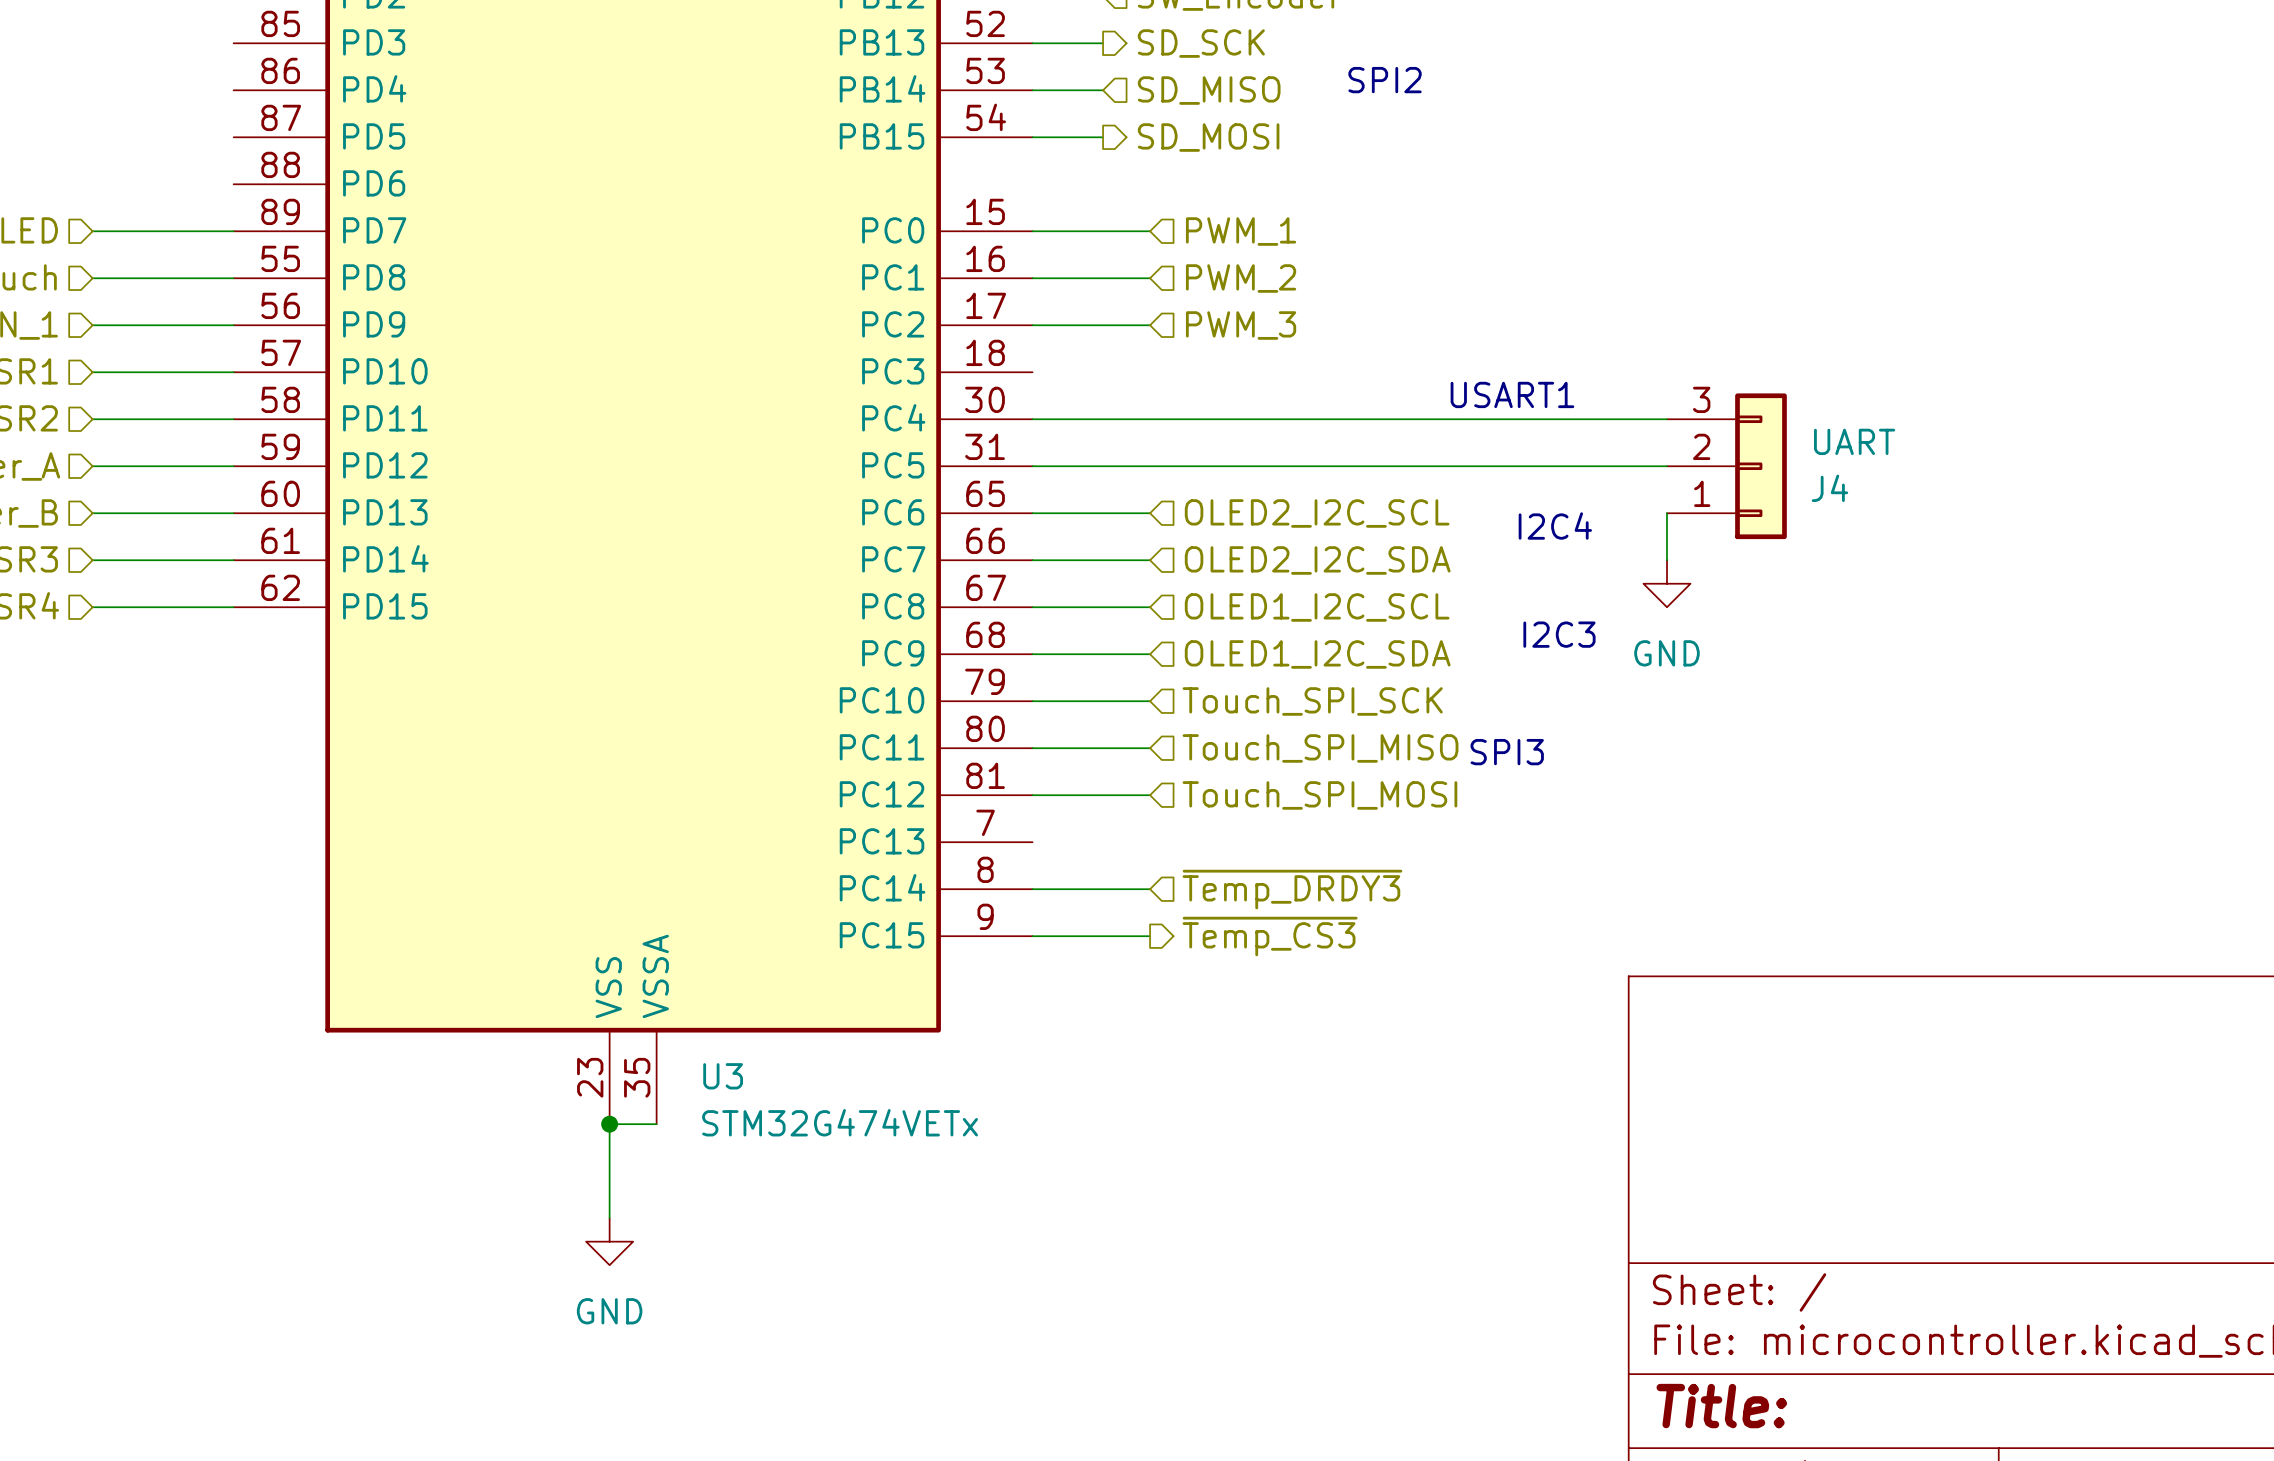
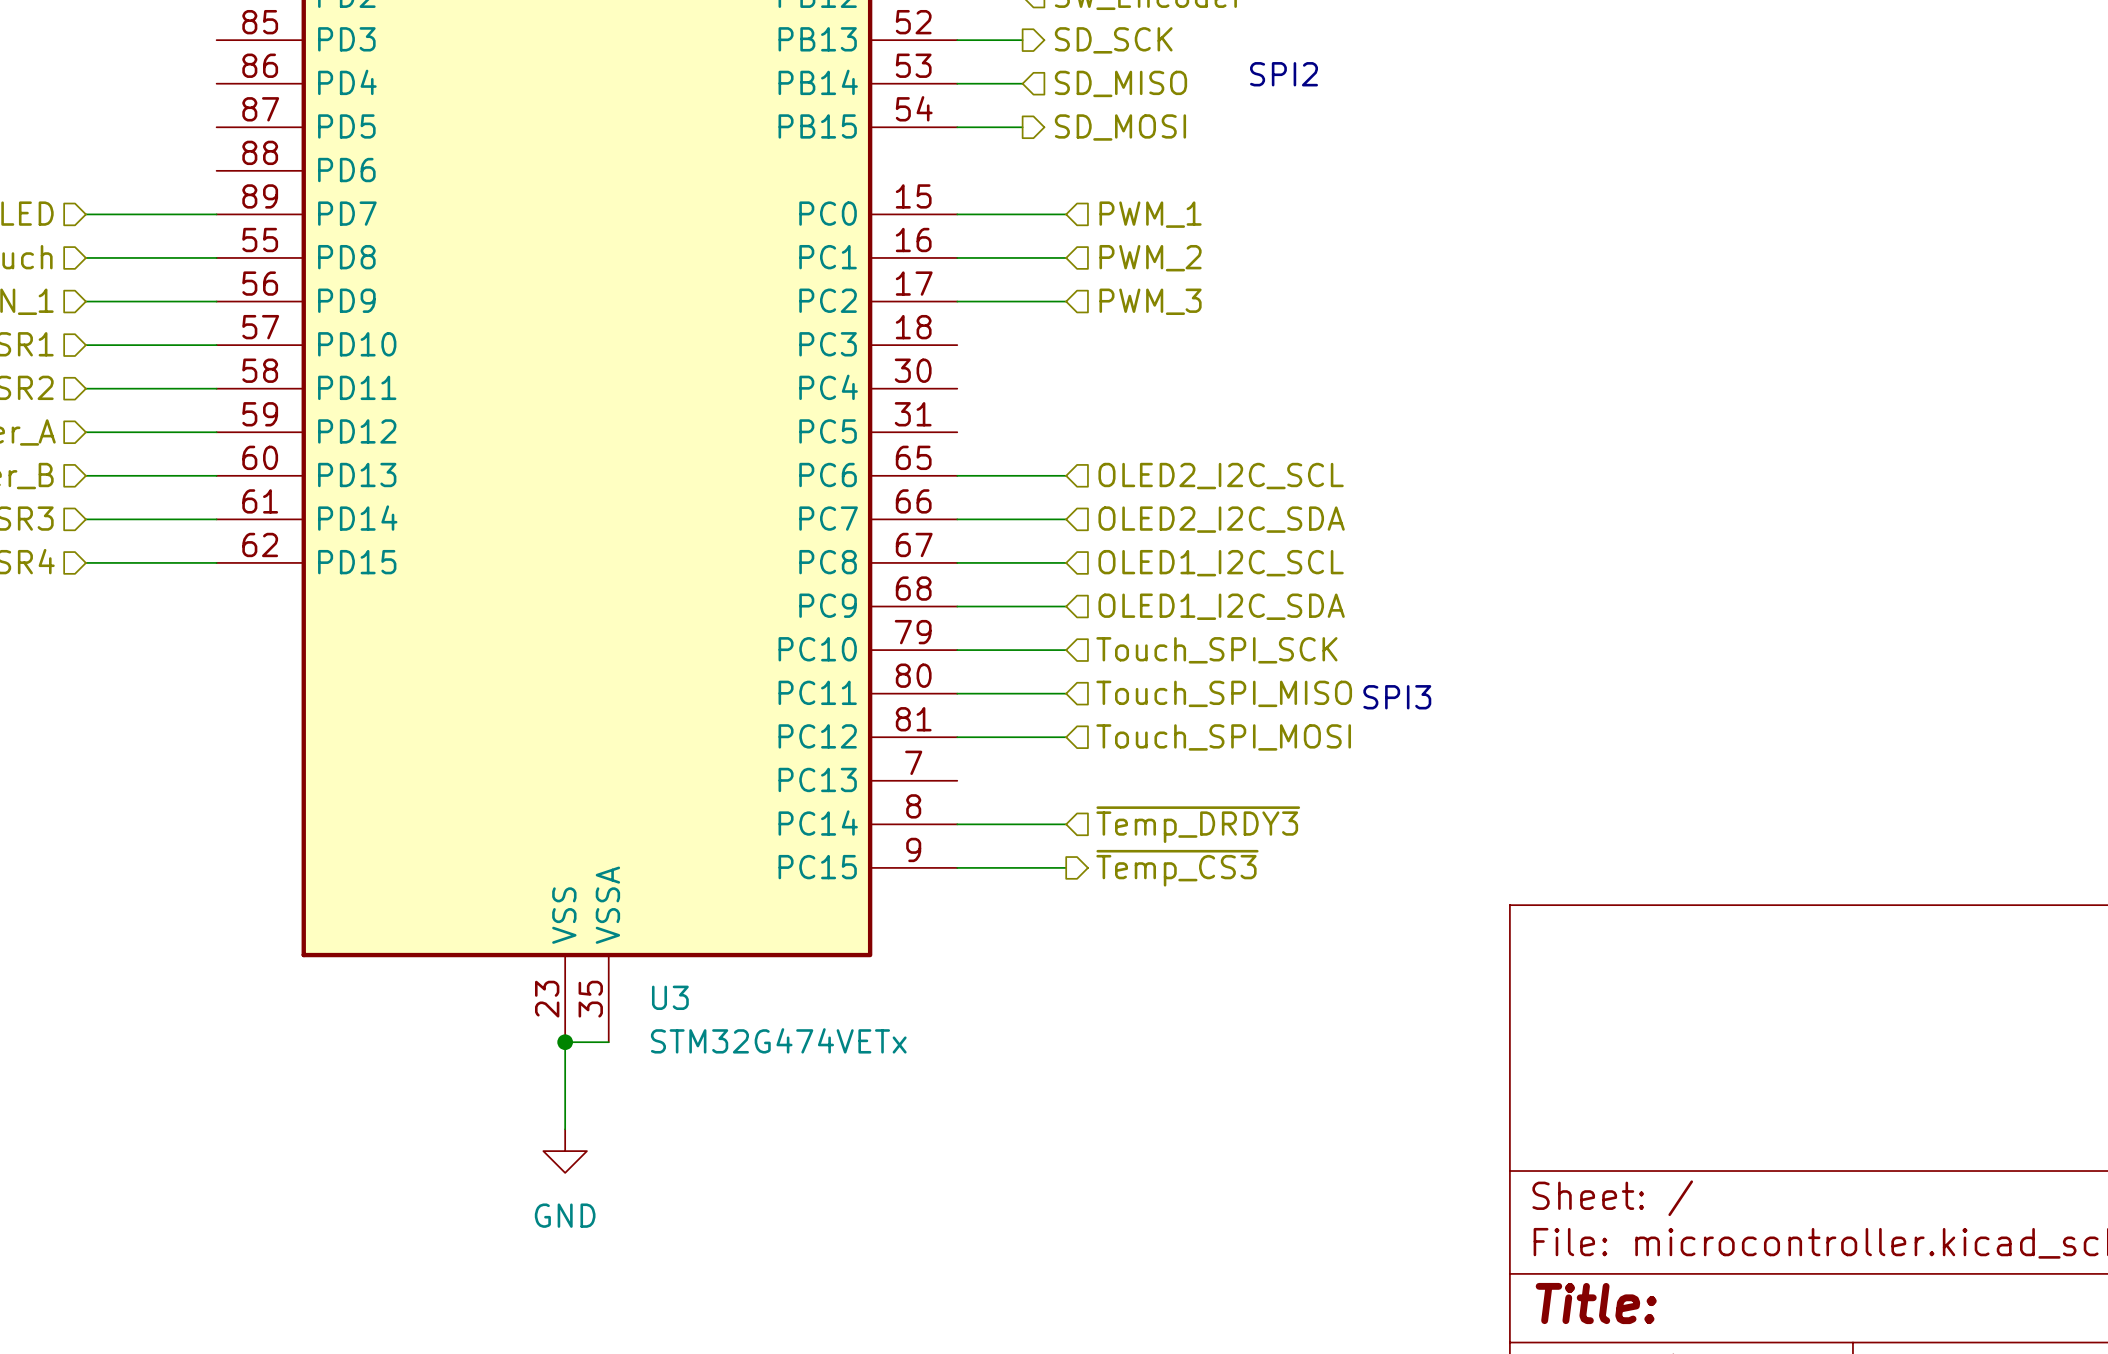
text: USART1 (1512, 394) -> none
wire: (1032, 419) (1667, 419) -> none
wire: (1032, 466) (1667, 466) -> none
J4: UART (1726, 466) -> none
wire: (1667, 513) (1667, 560) -> none
text: I2C4 (1555, 525) -> none
power symbol: GND (1667, 583) -> none
text: I2C3 (1559, 634) -> none

